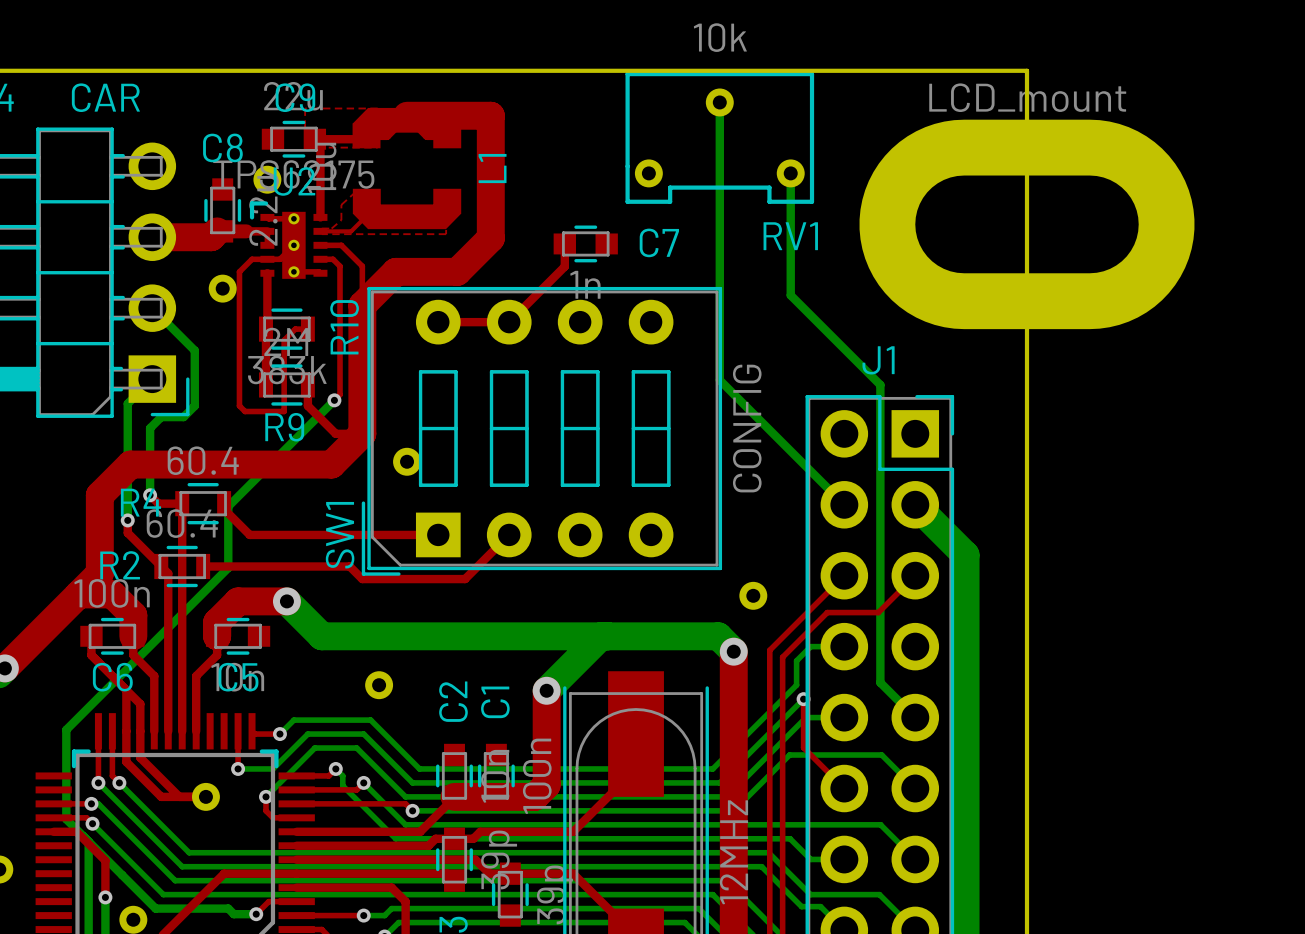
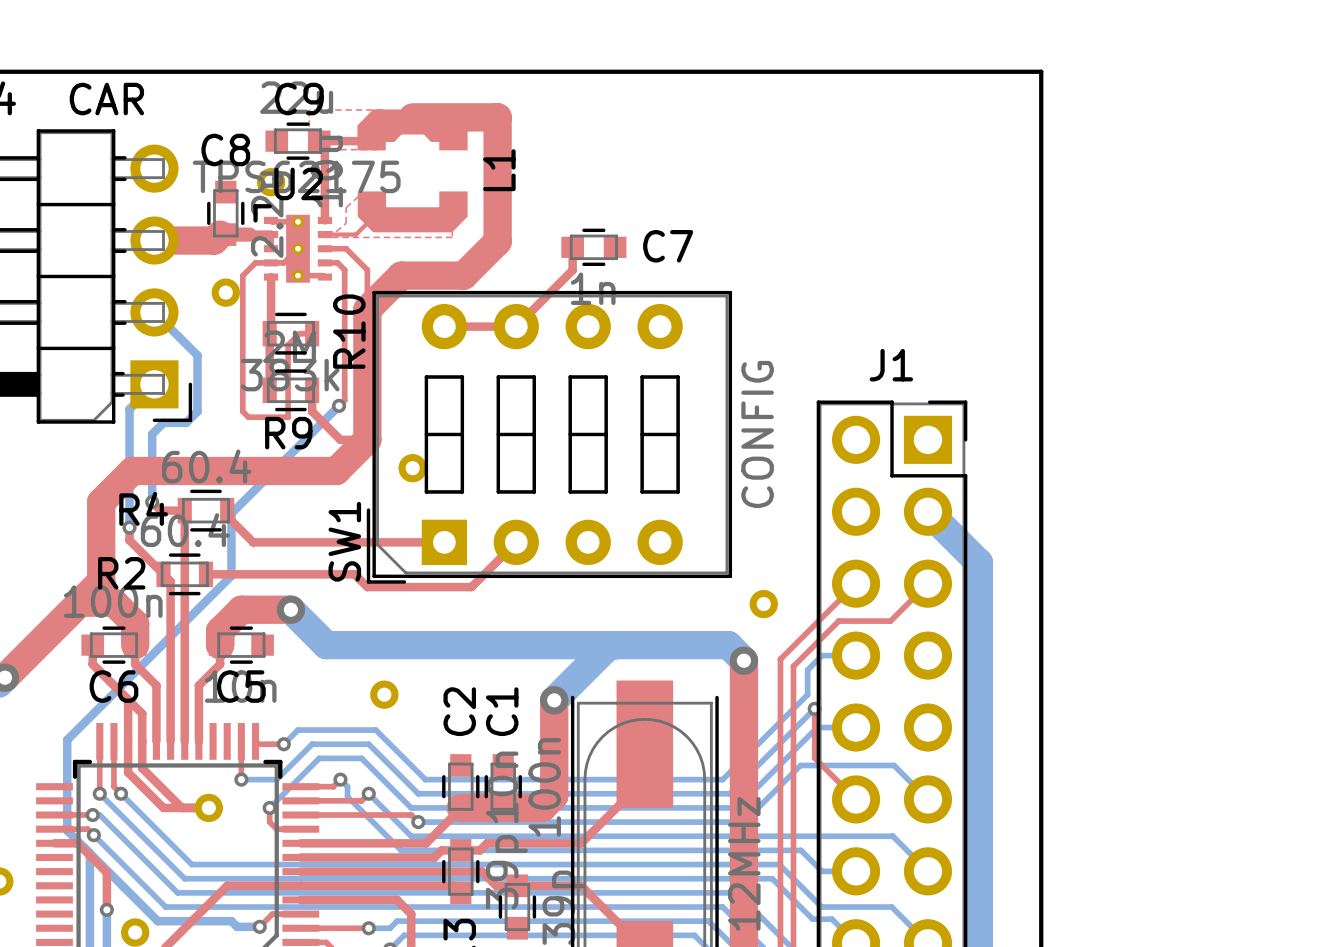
bottom track: (719, 102) (719, 380) (844, 504) -> none
RV1: 10k (719, 137) -> none
bottom track: (790, 173) (790, 295) (880, 384) (880, 682) (915, 717) -> none
part: LCD_mount (1027, 224) -> none

